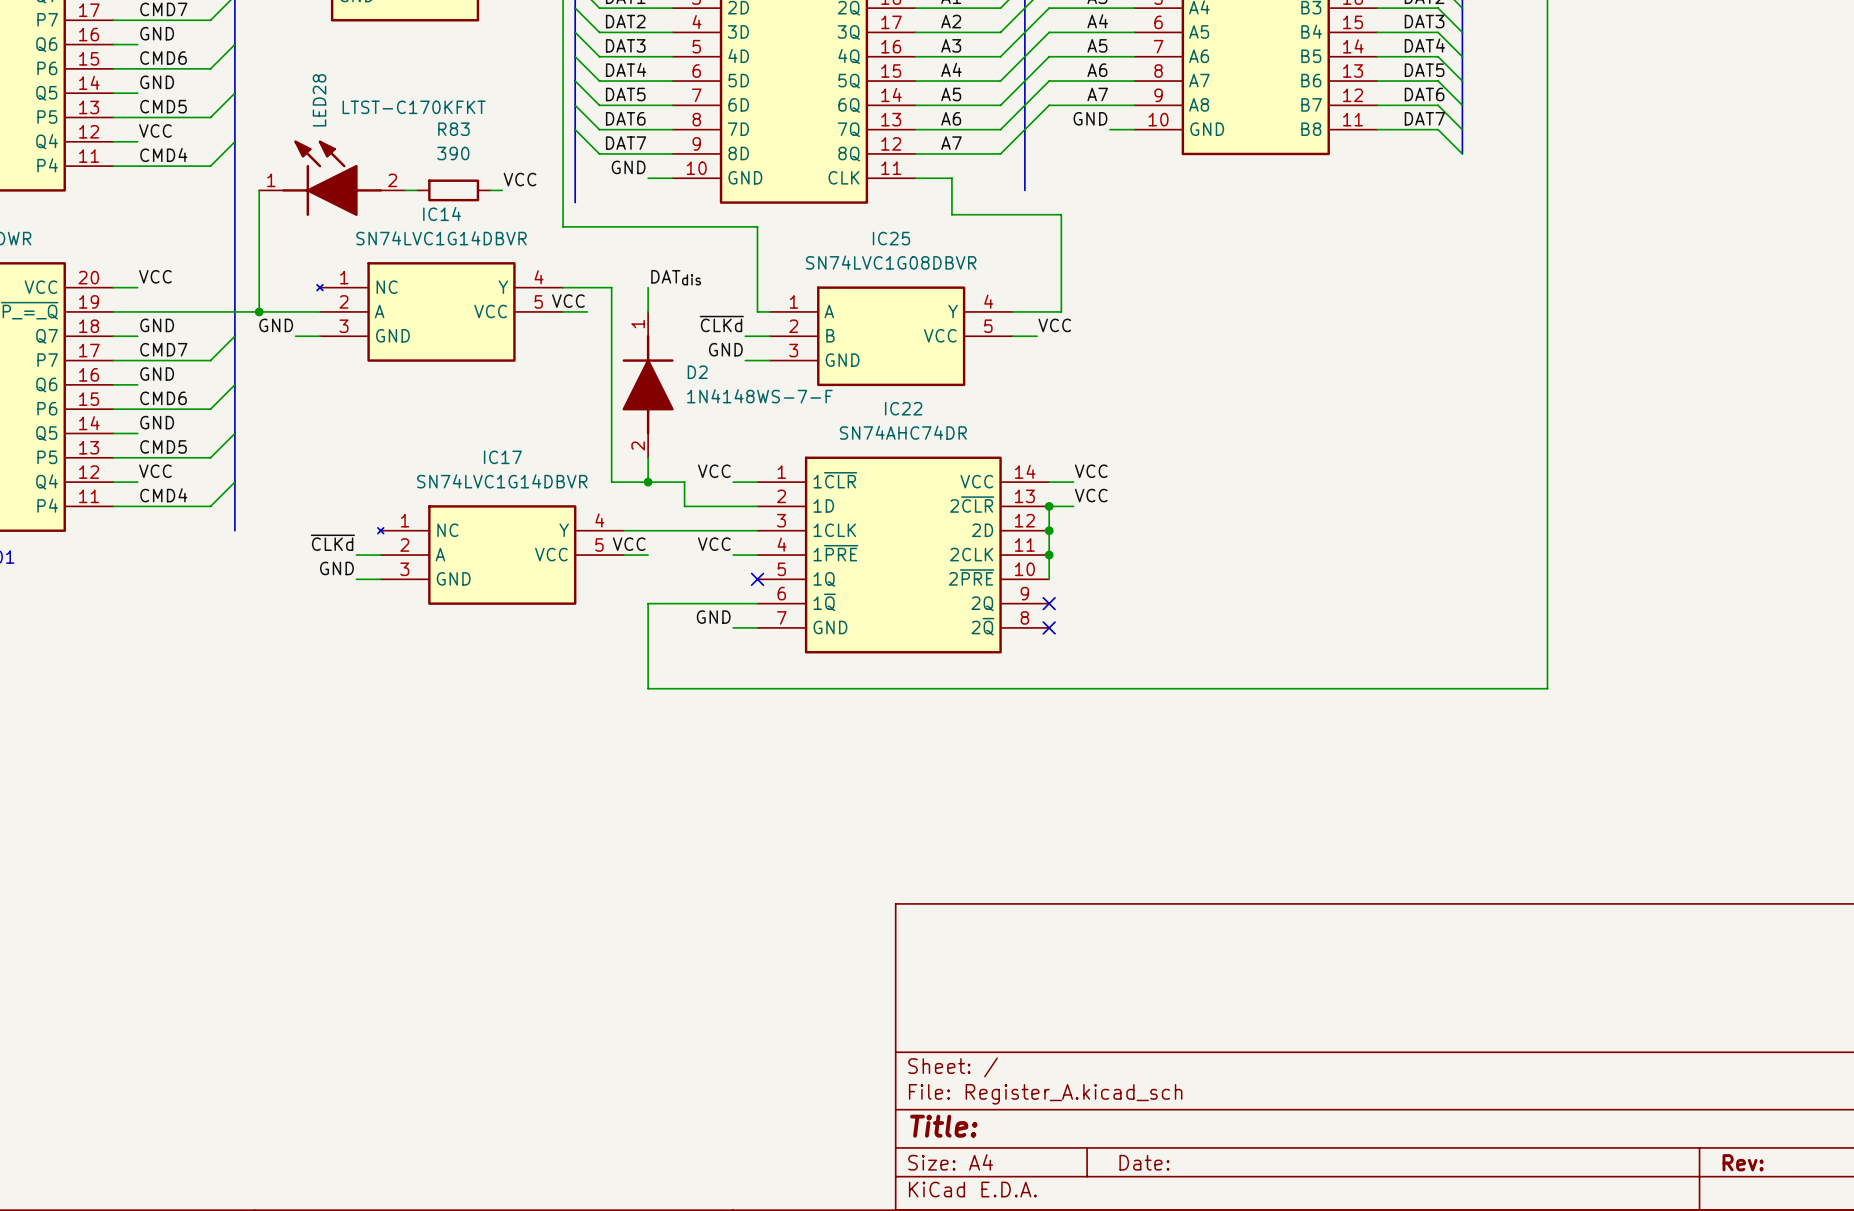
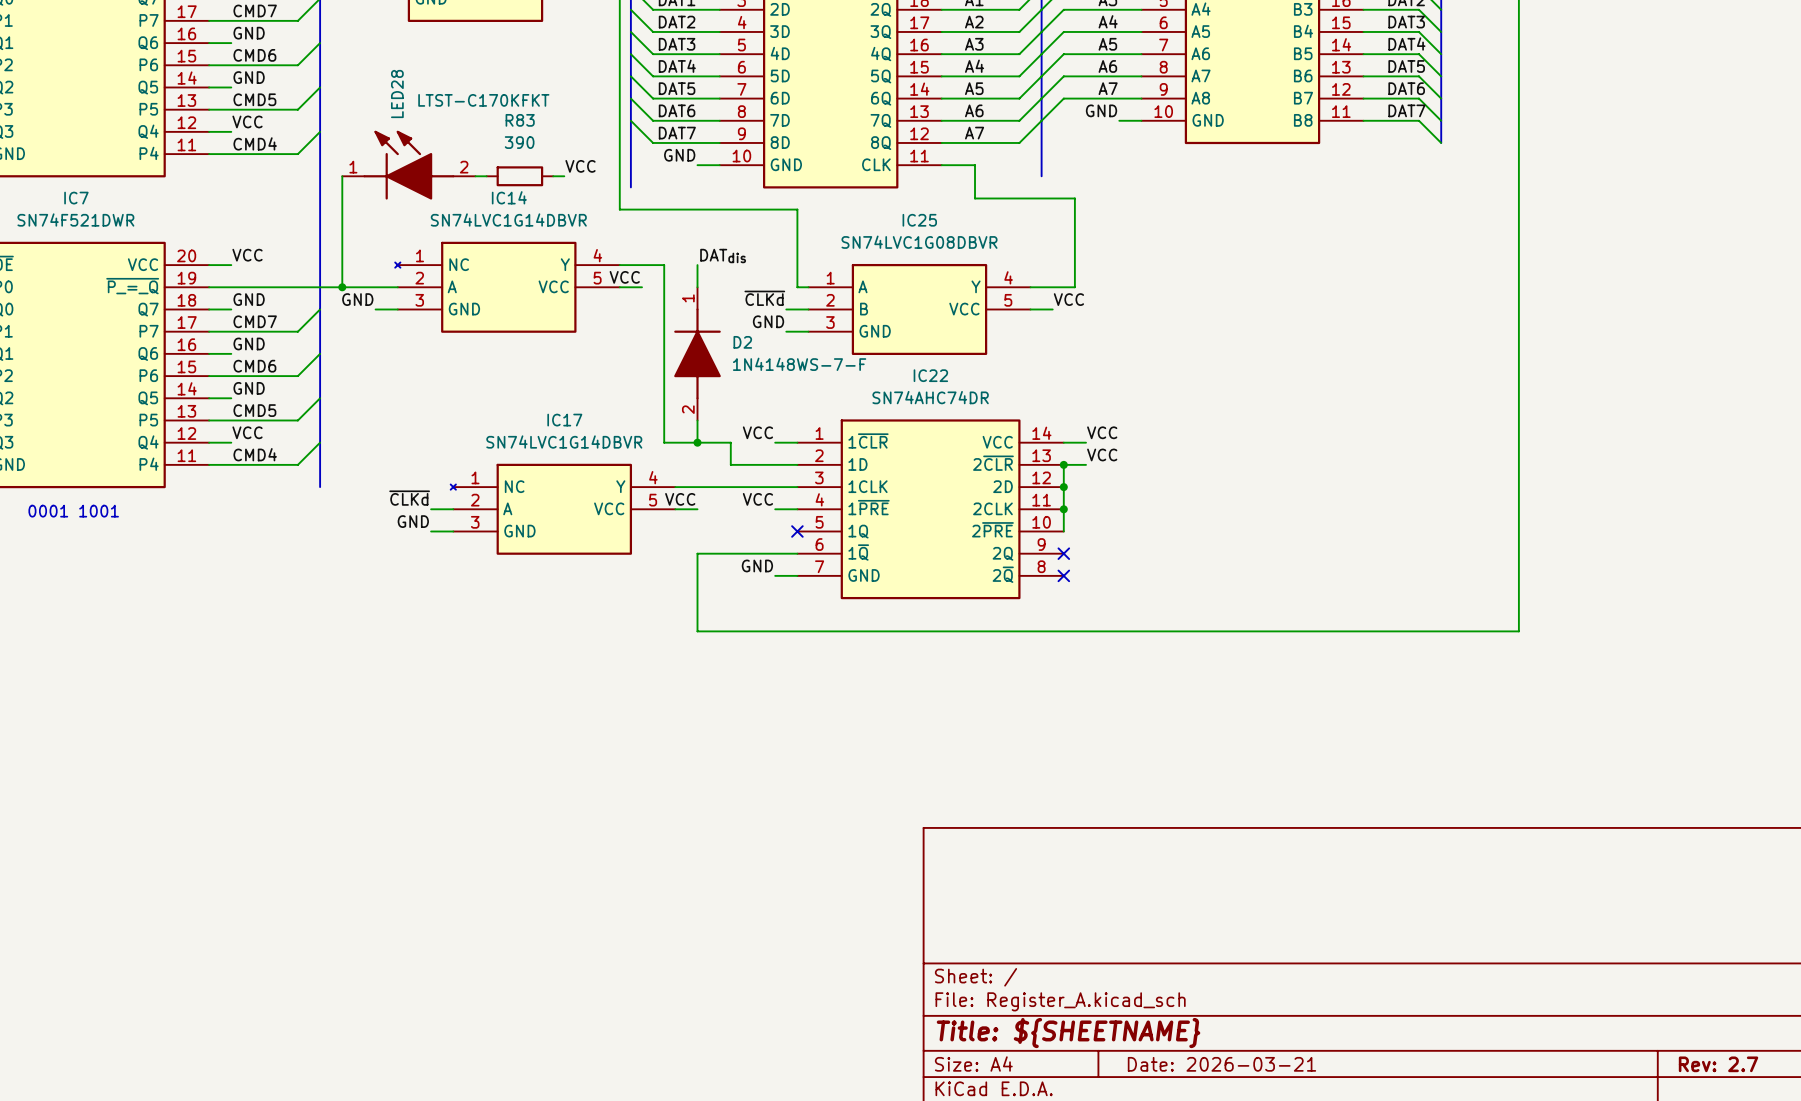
title block: Title: (943, 1126) -> Title: ${SHEETNAME} (1068, 1033)
title block: Date: (1144, 1162) -> Date: 2026-03-21 (1221, 1064)
title block: Rev: (1743, 1162) -> Rev: 2.7 (1718, 1064)

